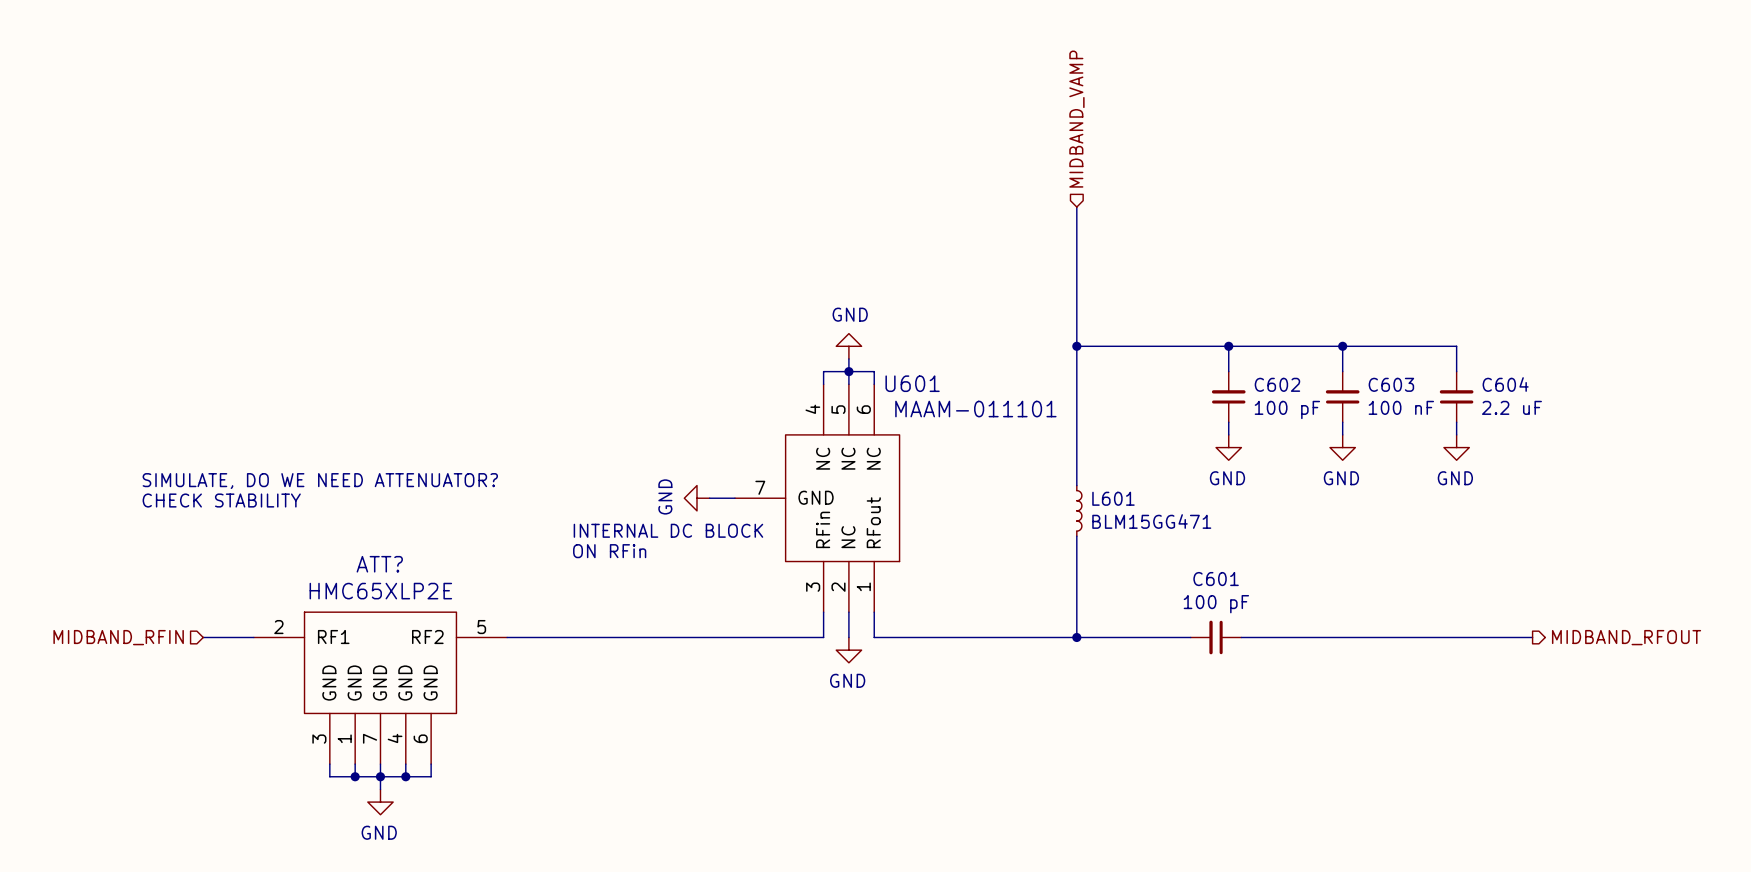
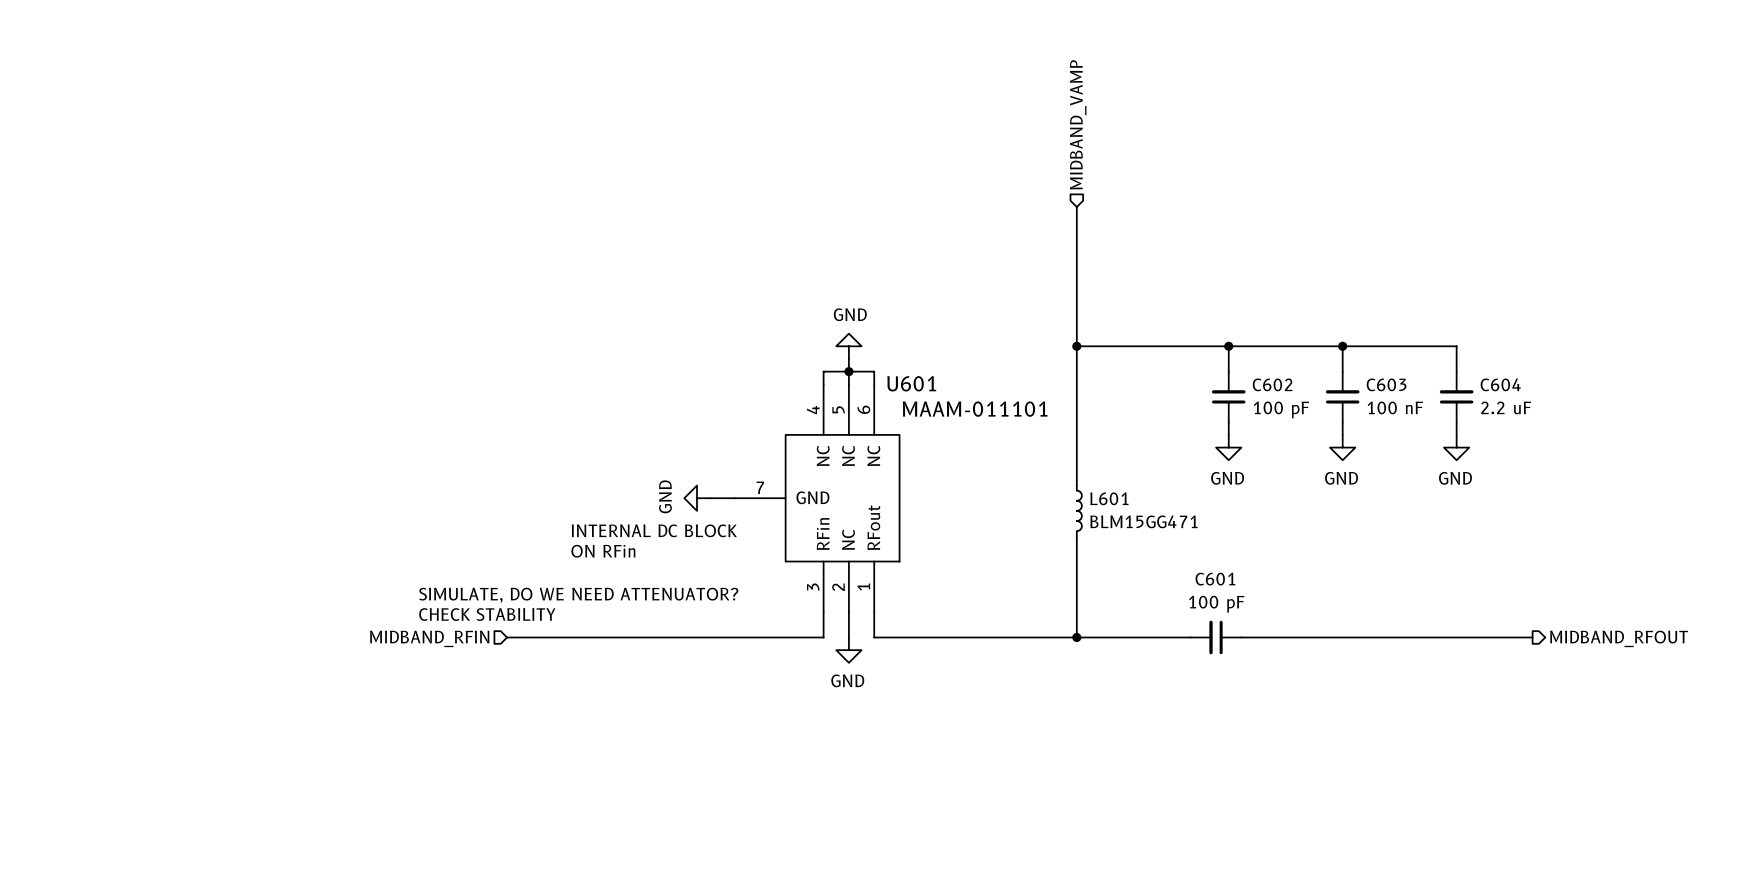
text: SIMULATE, DO WE NEED ATTENUATOR? (320, 481) -> none
text: CHECK STABILITY (221, 500) -> none
text: none -> SIMULATE, DO WE NEED ATTENUATOR? (578, 595)
text: none -> CHECK STABILITY (487, 614)
hierarchical label: MIDBAND_RFIN (118, 637) -> none
wire: (203, 637) (253, 637) -> none
hierarchical label: none -> MIDBAND_RFIN (429, 638)
ATT?: HMC65XLP2E (380, 688) -> none
wire: (329, 764) (329, 776) (431, 776) (431, 764) -> none
wire: (355, 764) (355, 776) -> none
wire: (380, 764) (380, 789) -> none
wire: (405, 764) (405, 776) -> none
junction: (355, 776) -> none
junction: (380, 776) -> none
junction: (405, 776) -> none
power symbol: GND (380, 802) -> none

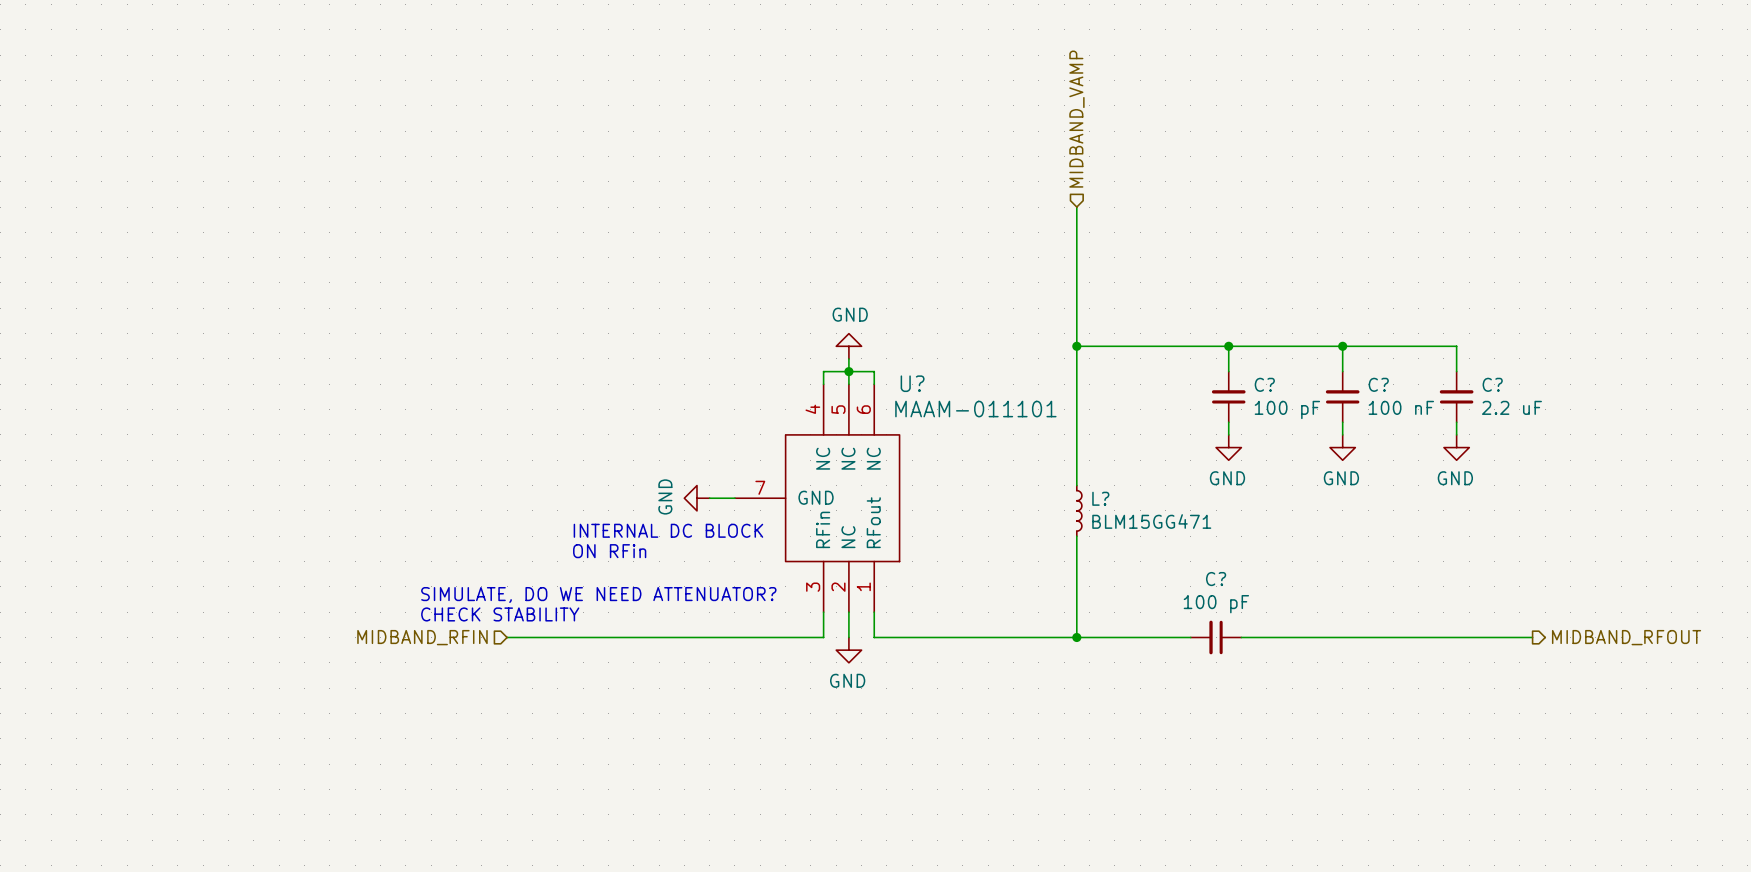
U601 name: U601 (911, 383) -> U? (912, 383)
C602 name: C602 (1272, 384) -> C? (1264, 384)
C603 name: C603 (1386, 384) -> C? (1378, 384)
C604 name: C604 (1500, 384) -> C? (1492, 384)
L601 name: L601 (1109, 498) -> L? (1100, 498)
C601 name: C601 (1215, 579) -> C? (1216, 579)

